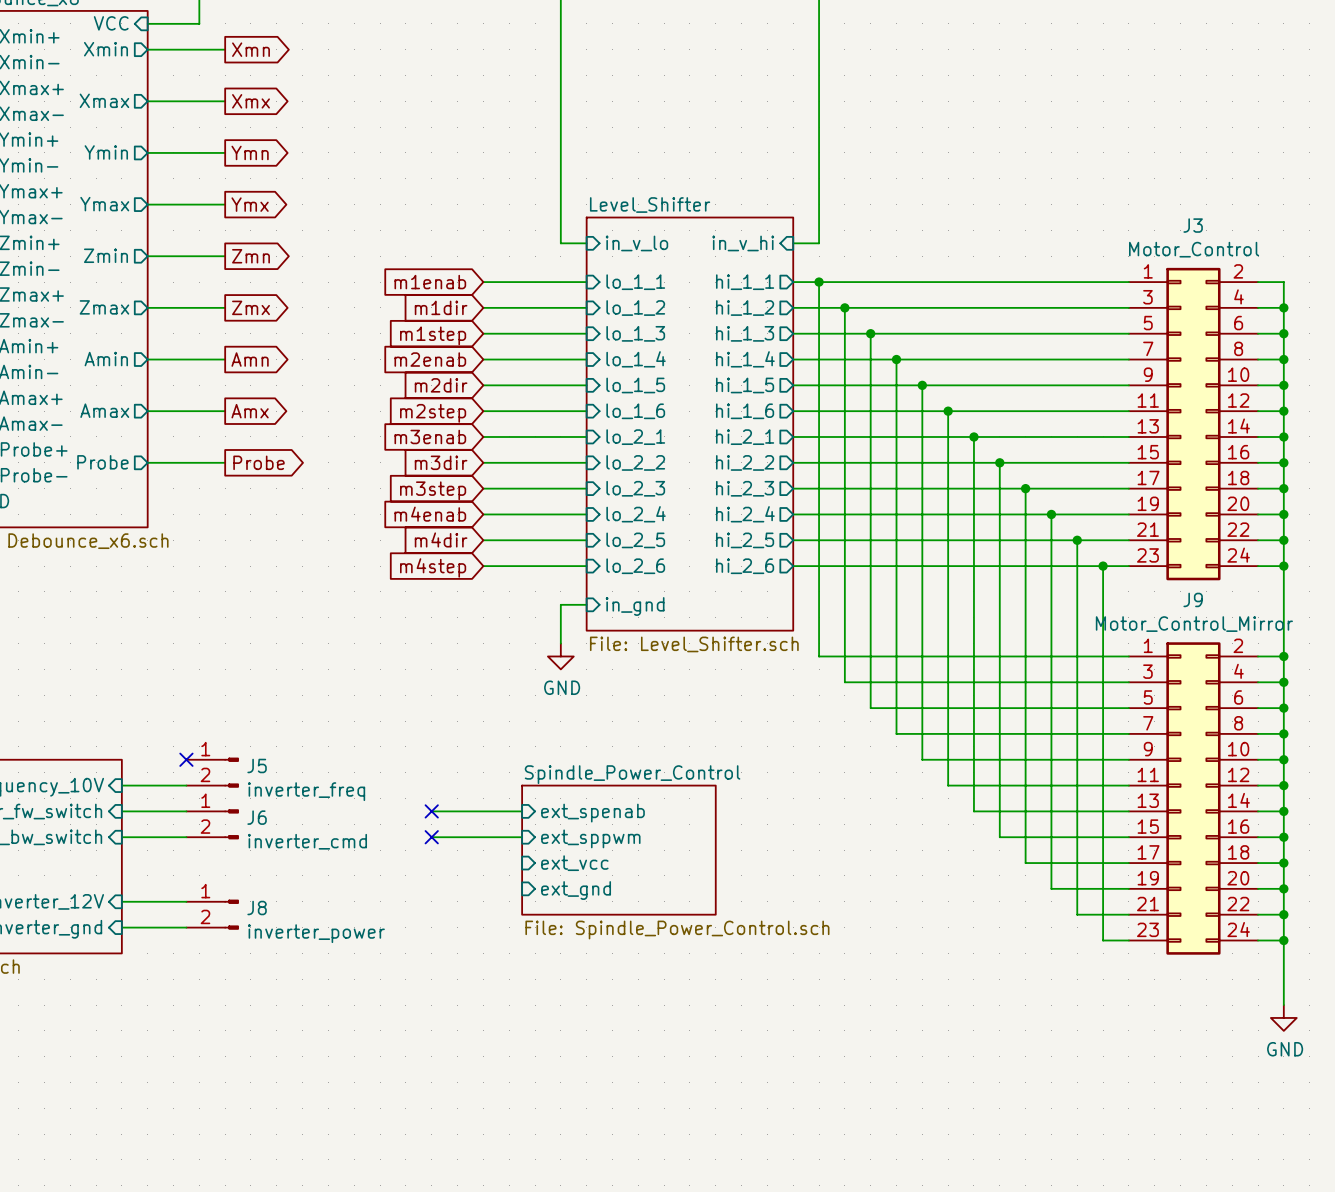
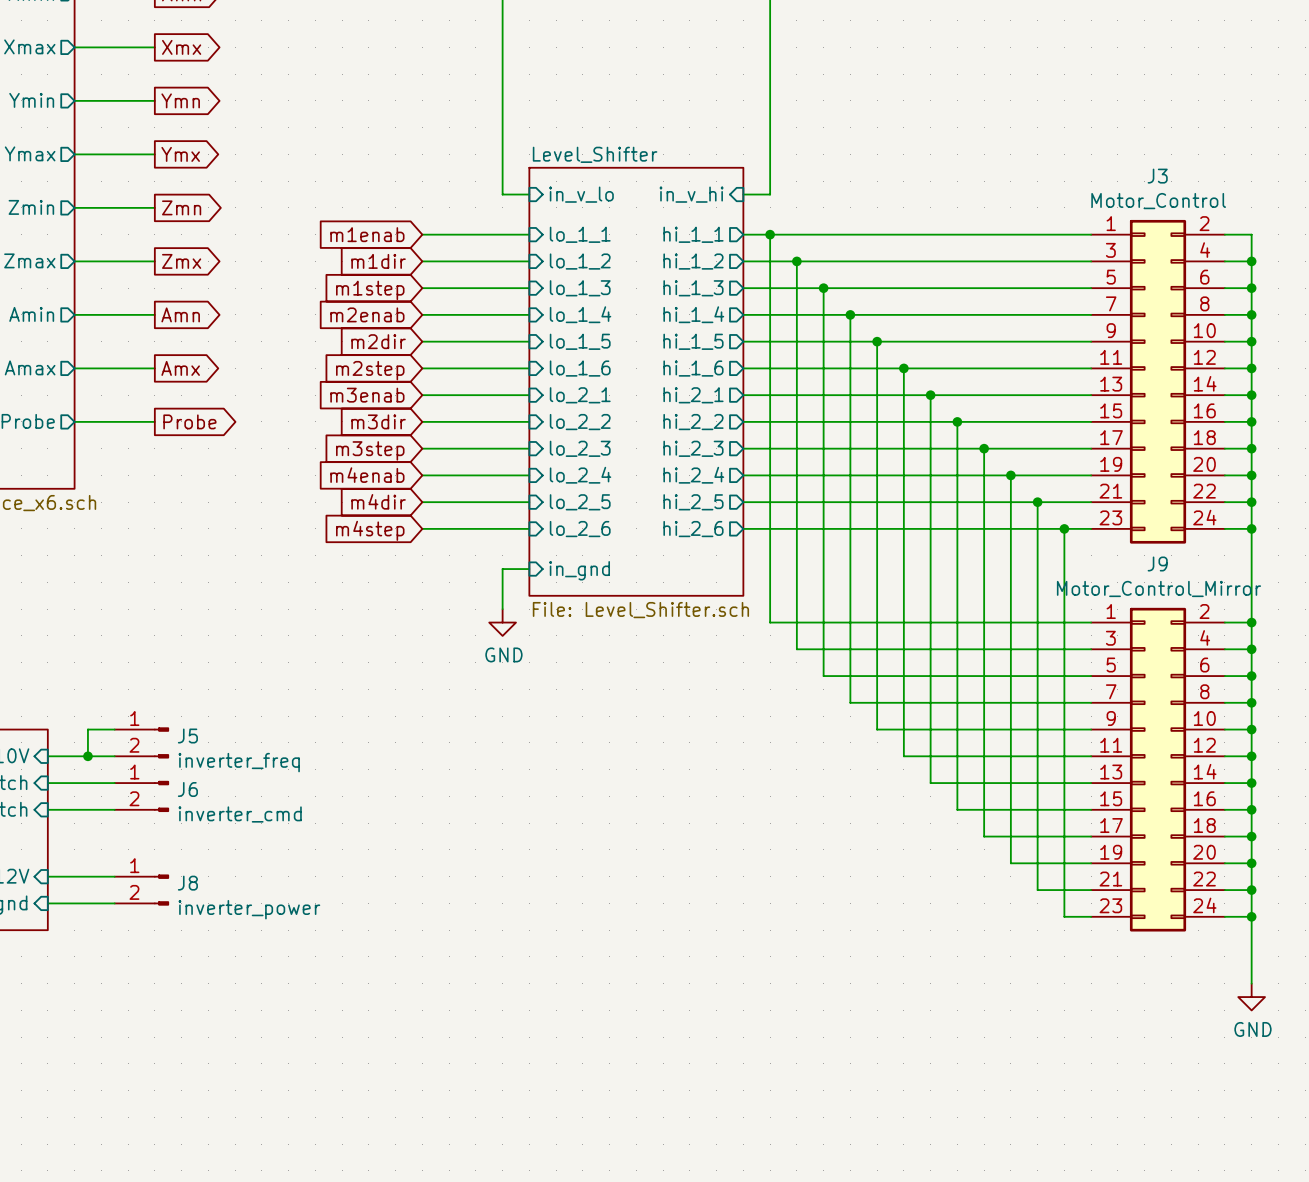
wire: none -> (114, 729) (87, 729) (87, 756)
no-connect mark: (186, 759) -> none
junction: none -> (87, 756)
wire: (431, 811) (522, 811) -> none
no-connect mark: (431, 811) -> none
sheet pin: ext_spenab (593, 813) -> none
wire: (431, 837) (522, 837) -> none
no-connect mark: (431, 837) -> none
sheet pin: ext_sppwm (590, 838) -> none
sheet Spindle_Power_Control: File: Spindle_Power_Control.sch (618, 850) -> none
sheet pin: ext_vcc (574, 863) -> none
sheet pin: ext_gnd (576, 890) -> none

